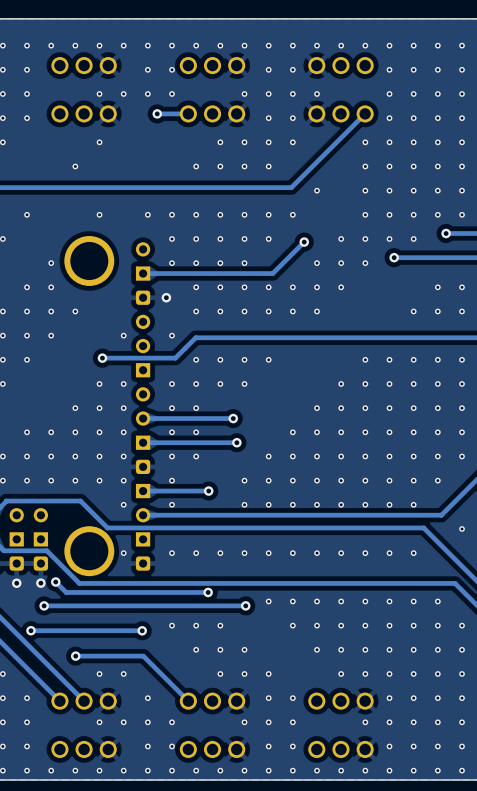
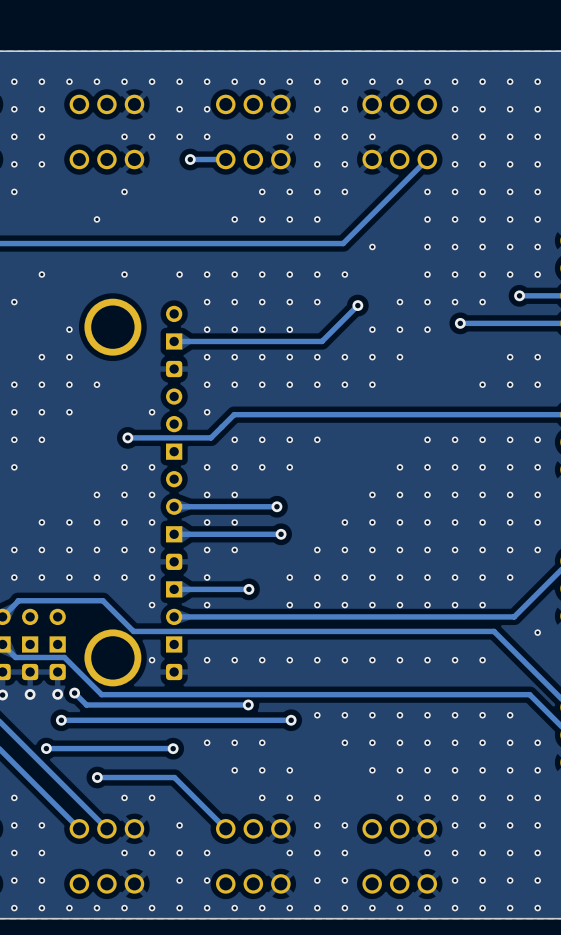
via: none -> (207, 357)
via: (166, 297) -> none
via: none -> (207, 384)

